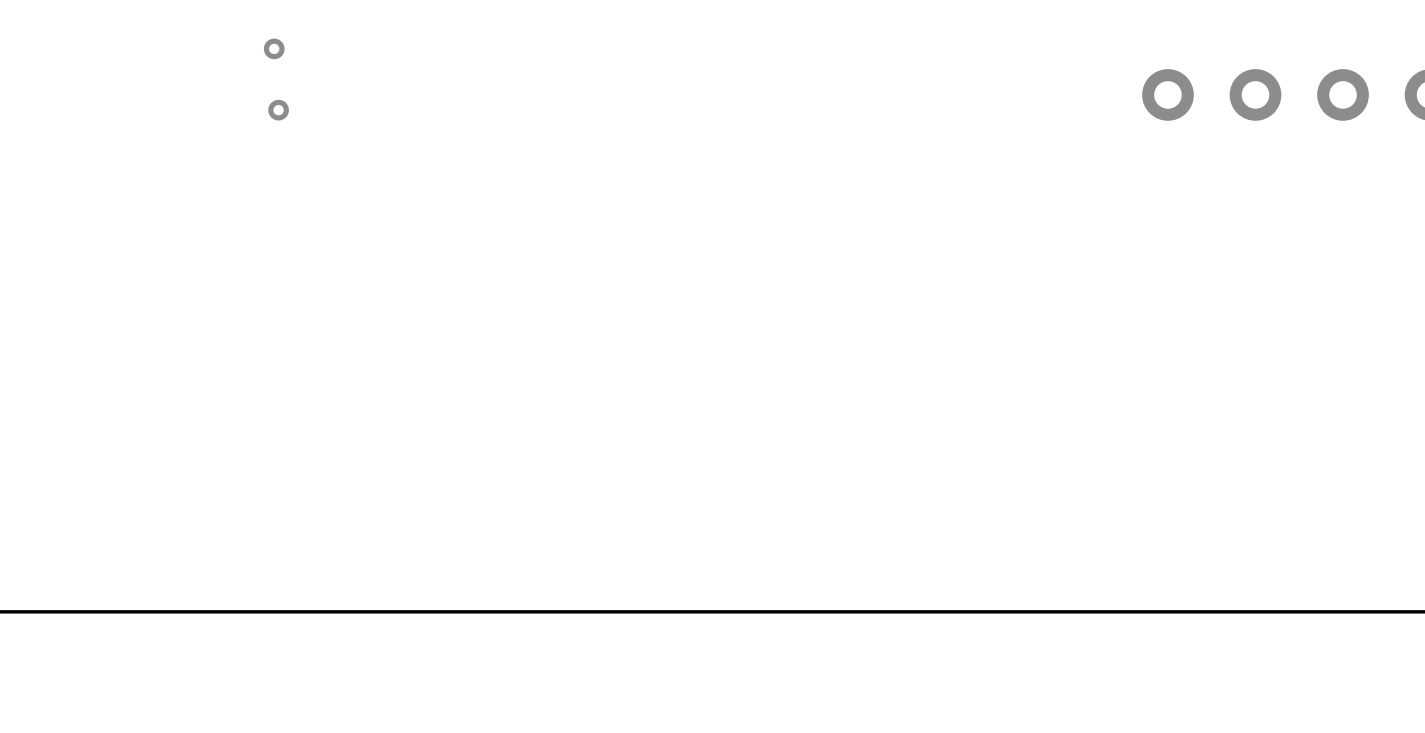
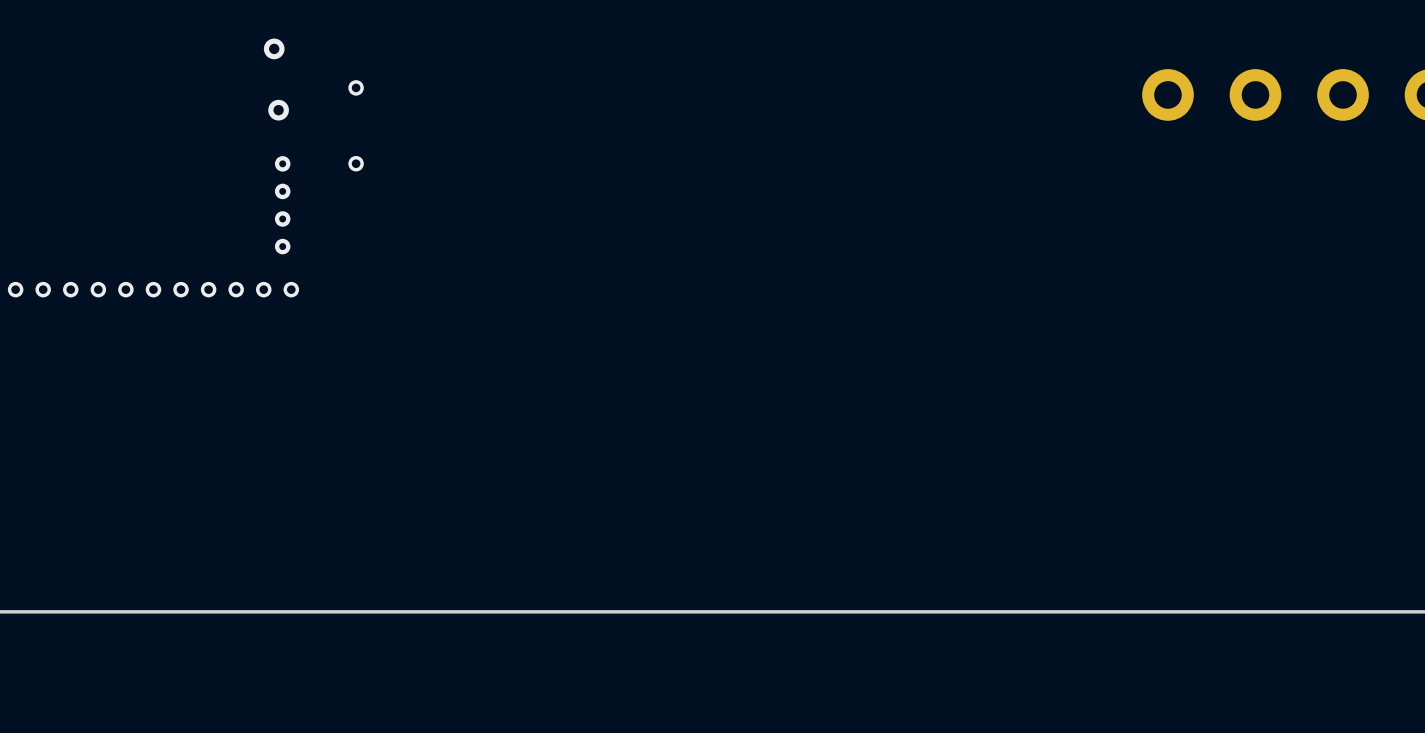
via: none -> (356, 87)
via: none -> (282, 163)
via: none -> (356, 163)
via: none -> (282, 191)
via: none -> (282, 218)
via: none -> (282, 246)
via: none -> (15, 289)
via: none -> (43, 289)
via: none -> (70, 289)
via: none -> (98, 289)
via: none -> (125, 289)
via: none -> (153, 289)
via: none -> (181, 289)
via: none -> (208, 289)
via: none -> (236, 289)
via: none -> (263, 289)
via: none -> (291, 289)

